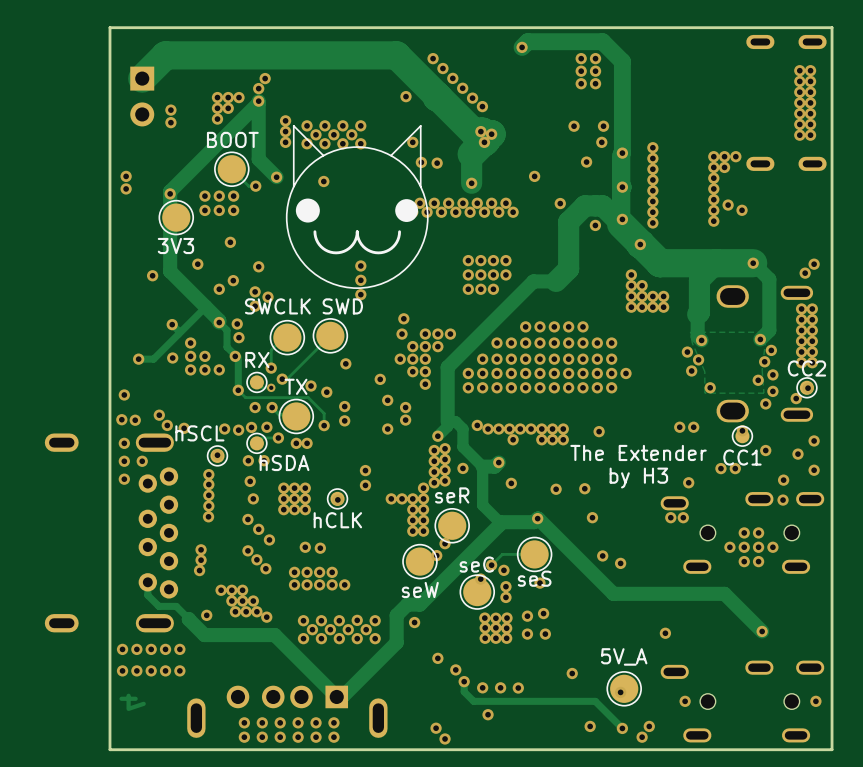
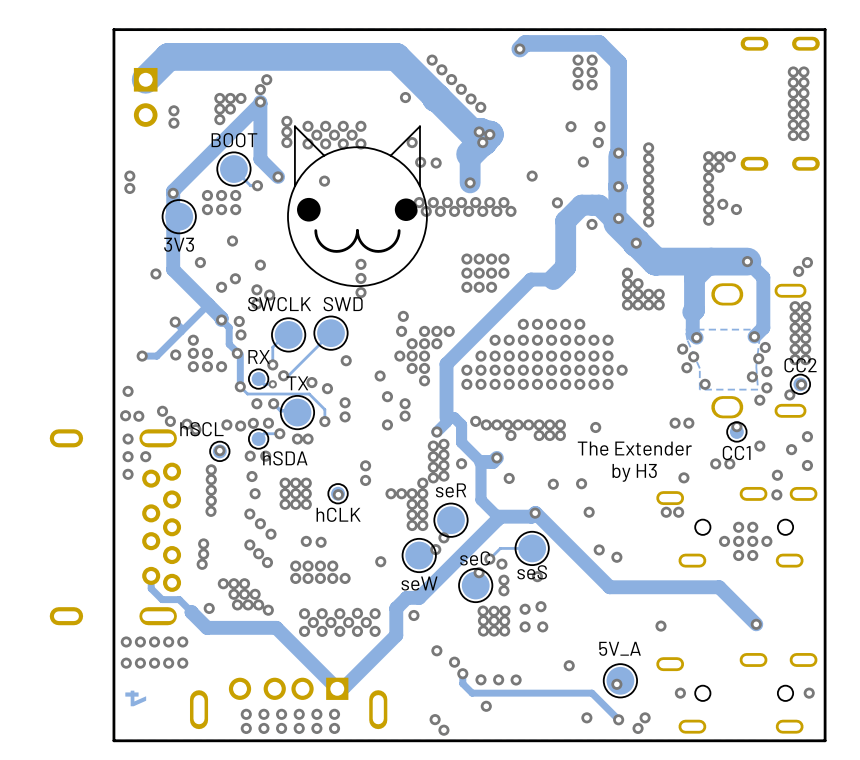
via: none -> (195, 429)
via: none -> (380, 561)

